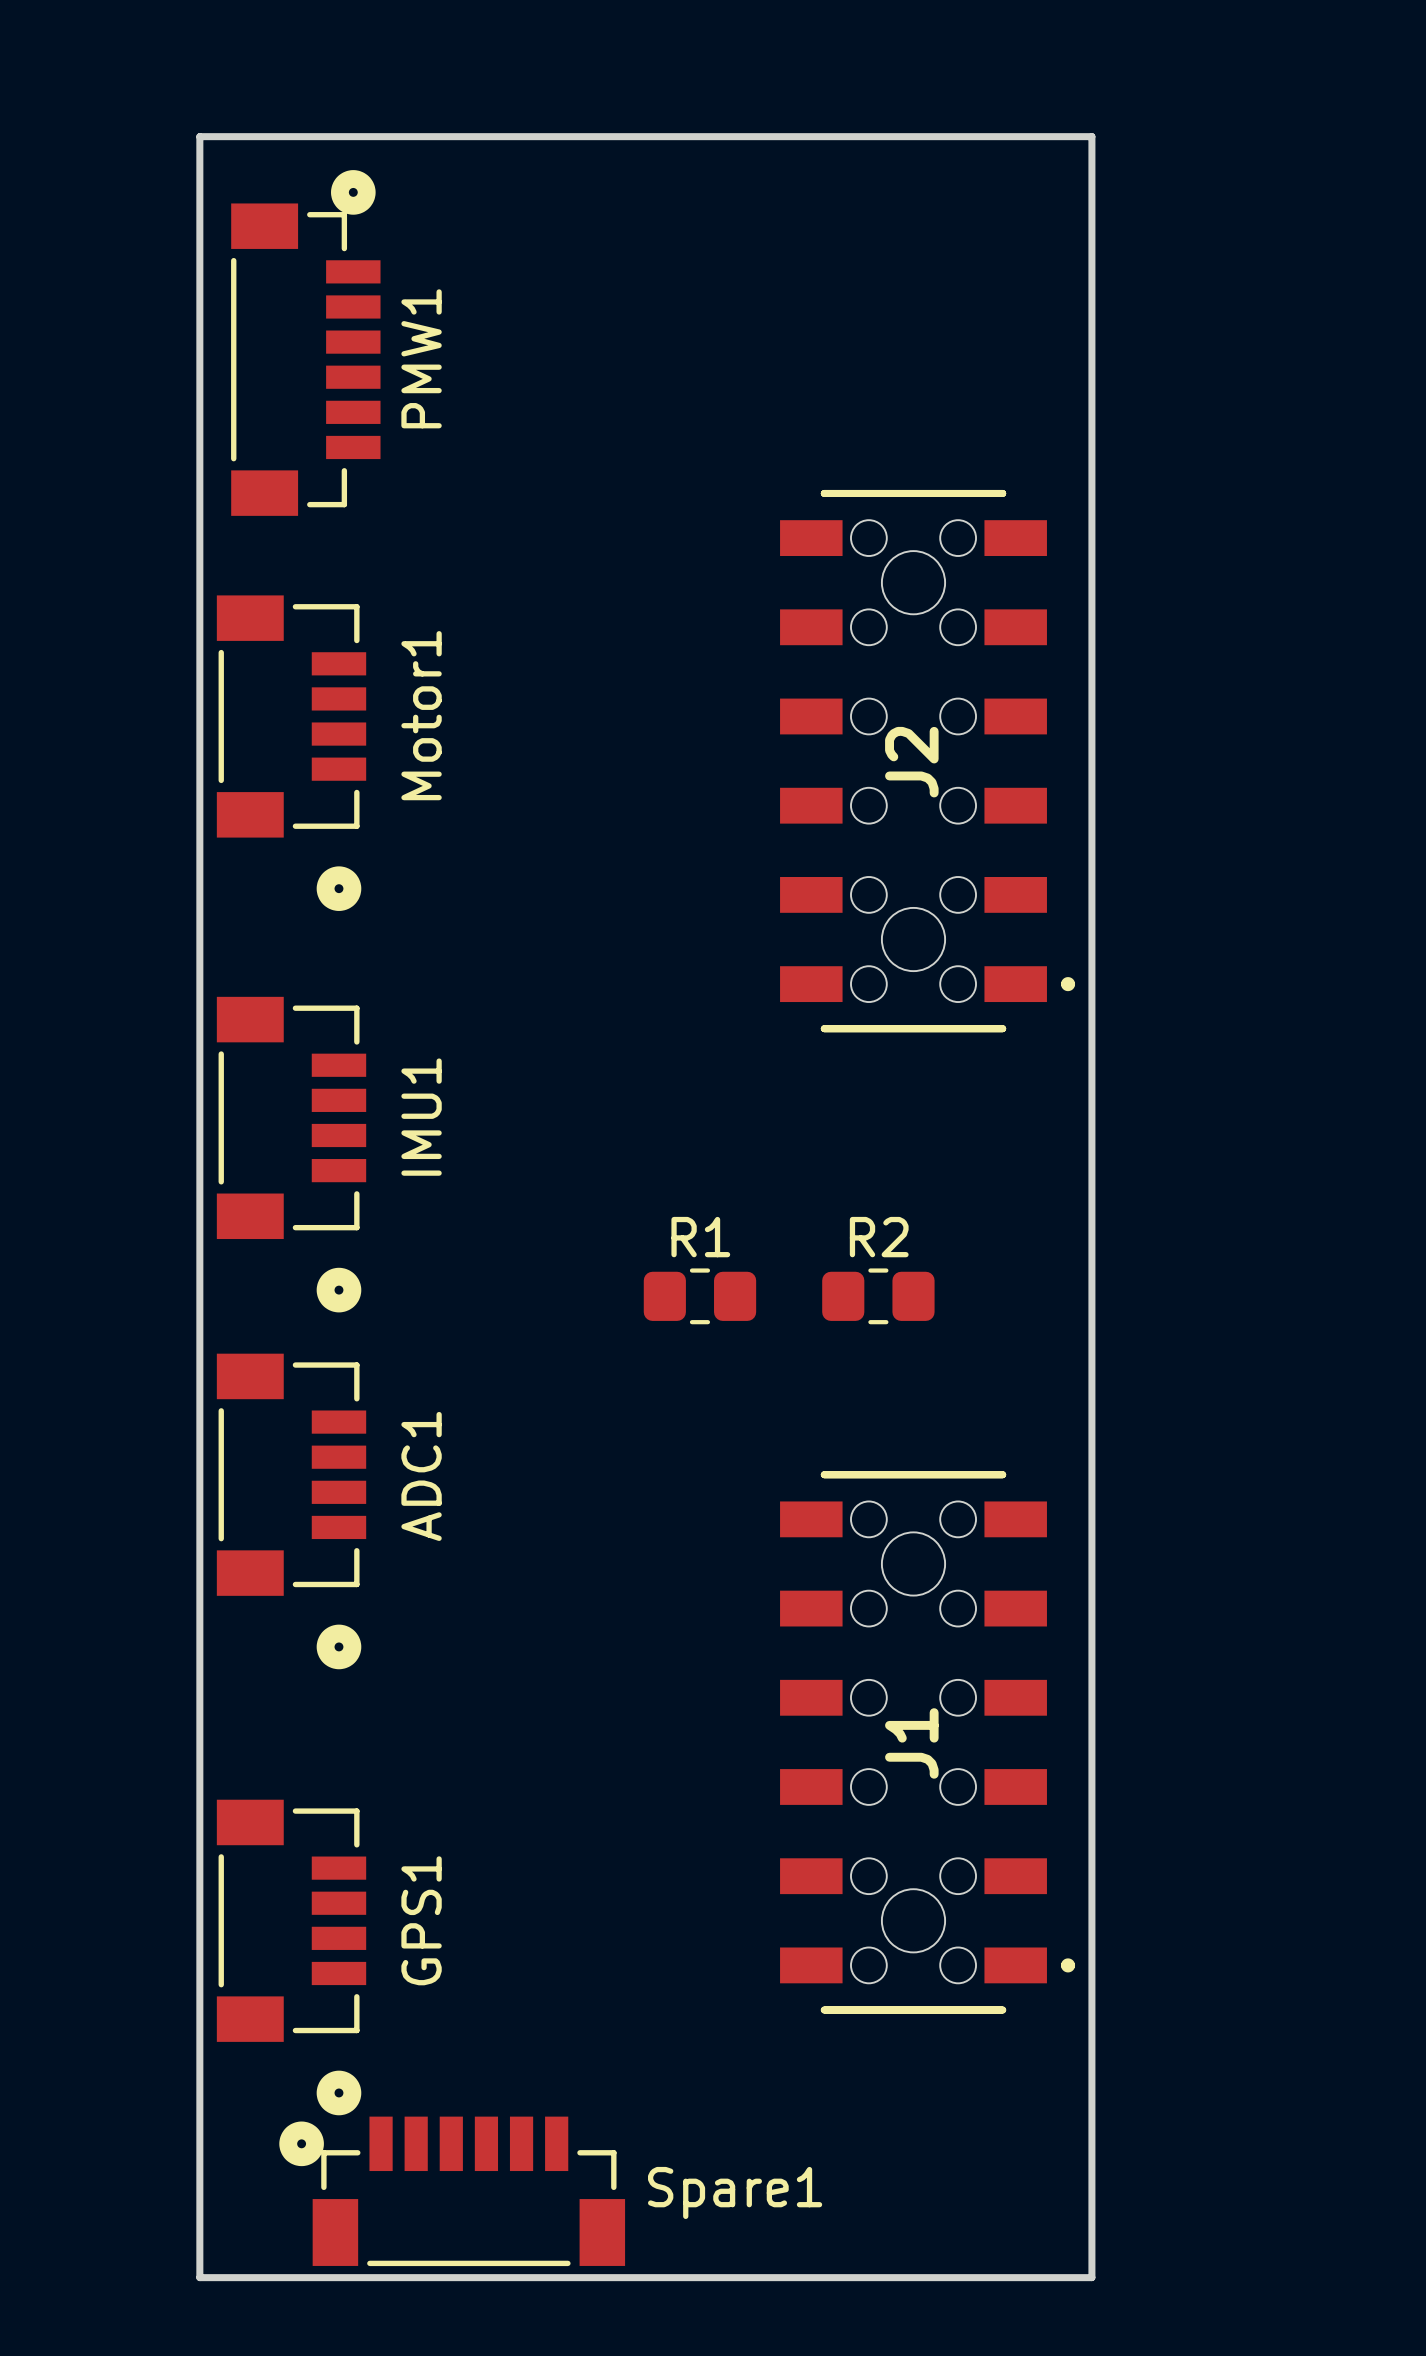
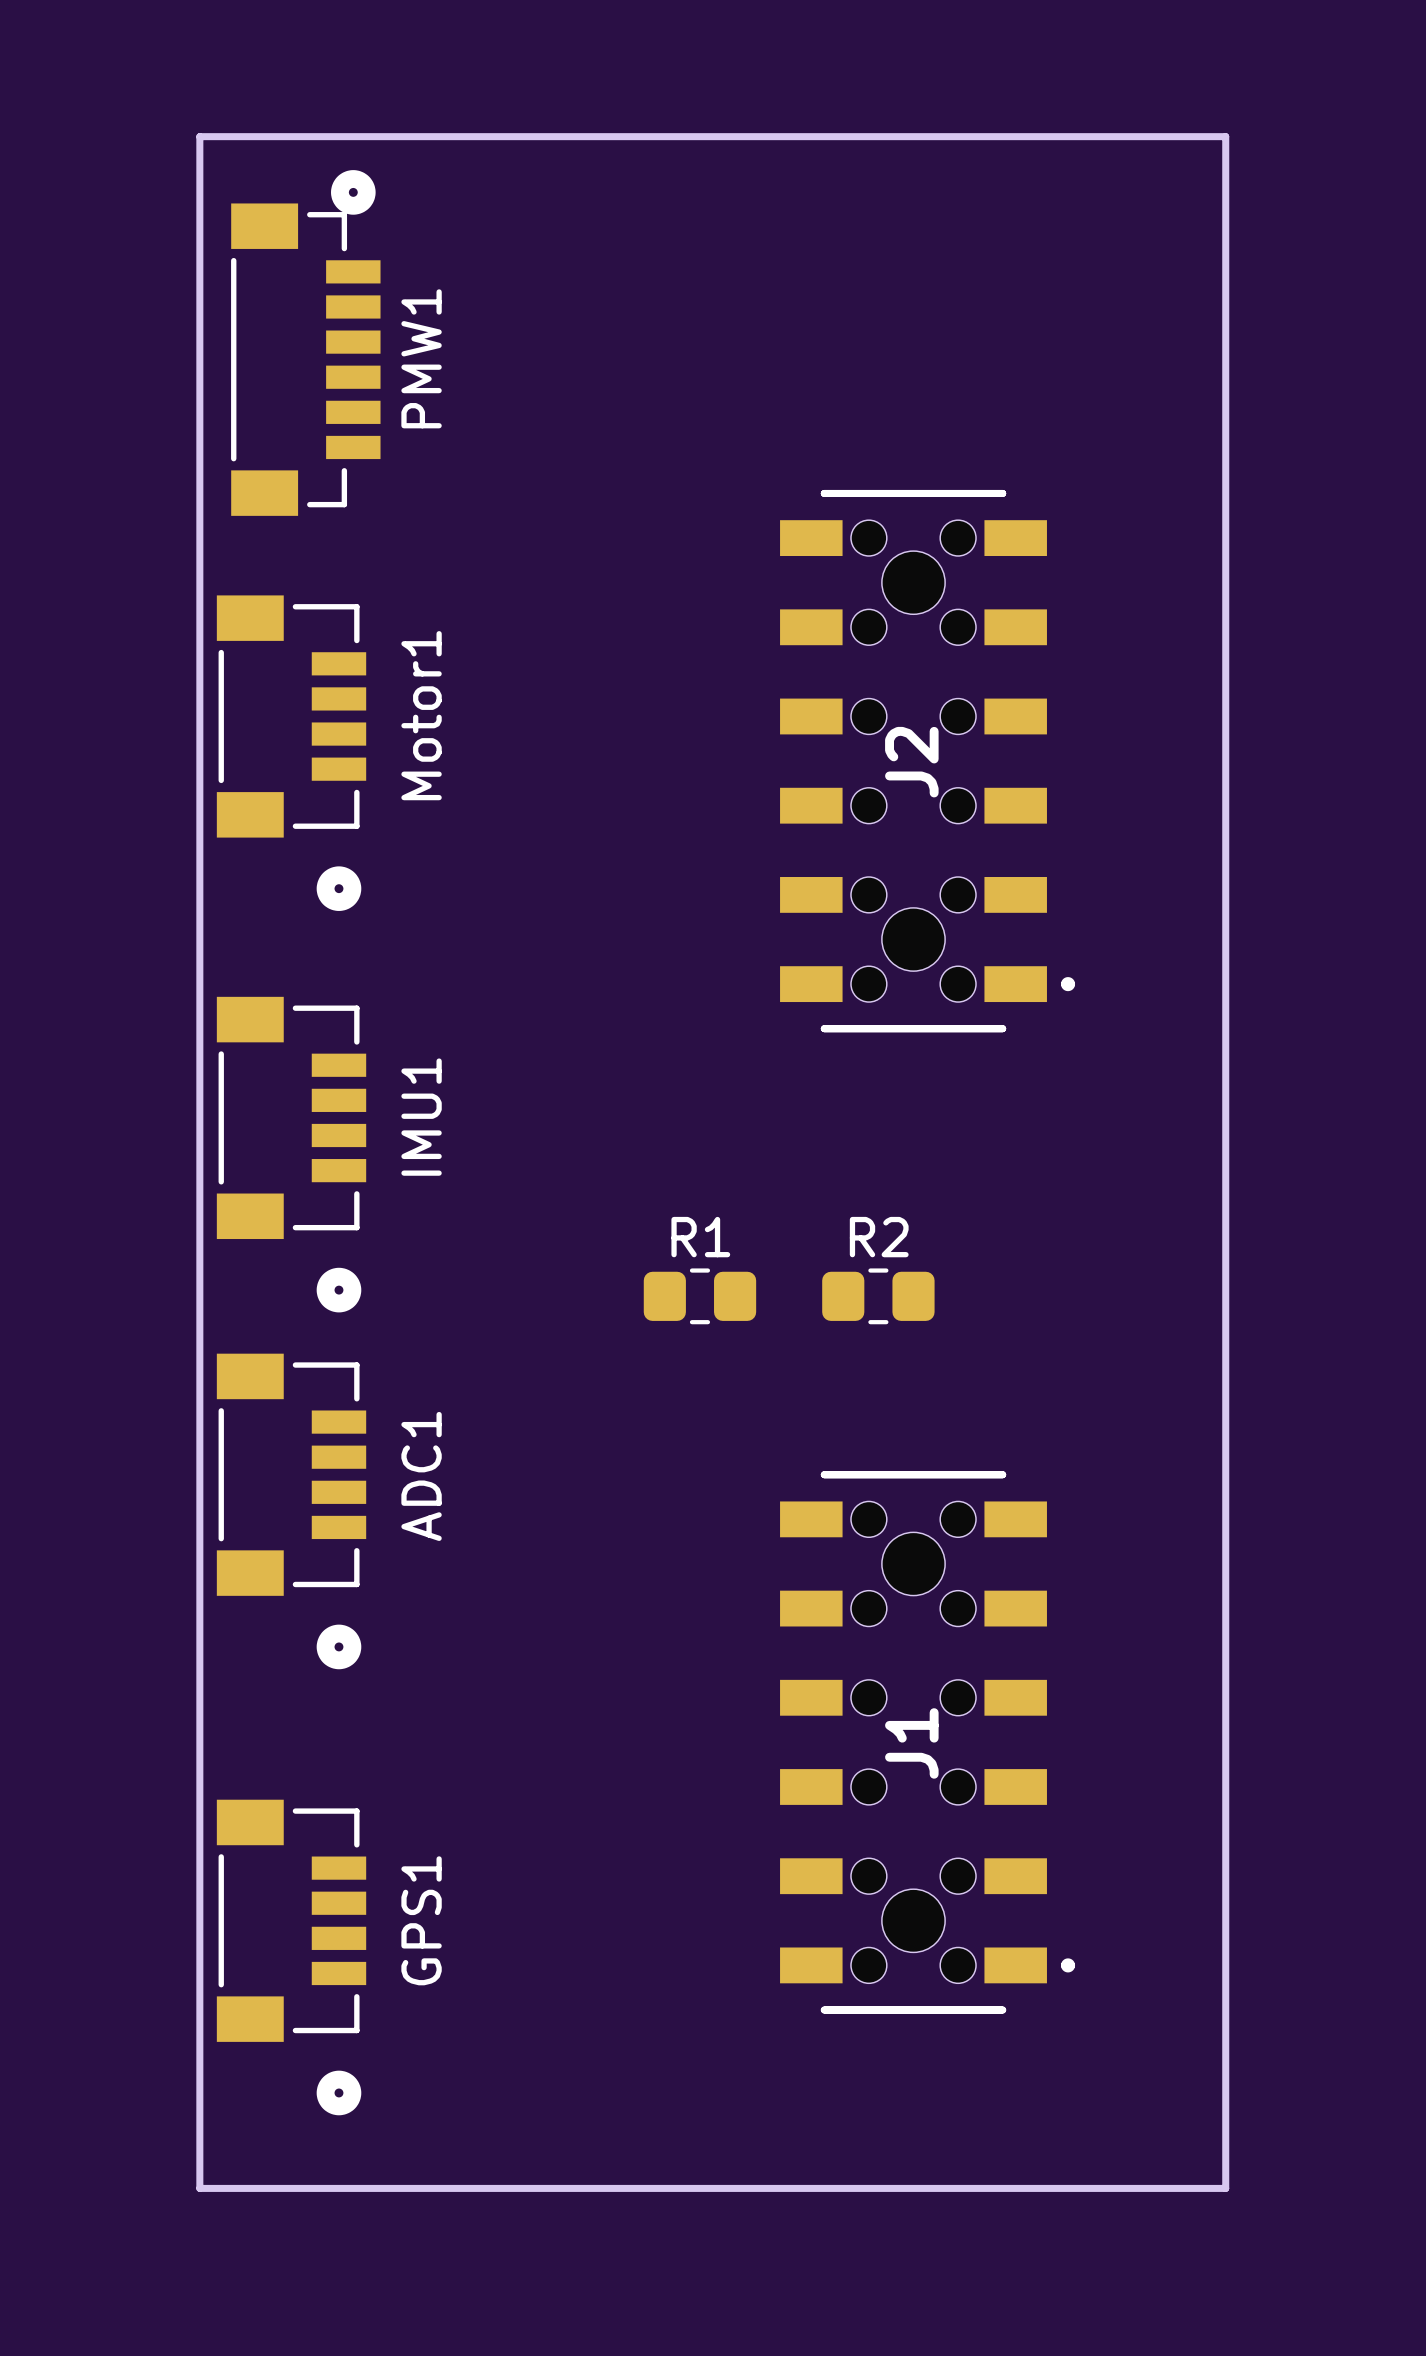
board edge: (1091, 136) (1091, 2277) (199, 2277) (199, 2188) -> (1091, 136) (1225, 136) (1225, 2188) (199, 2188)
Spare1: (452, 2191) -> none

